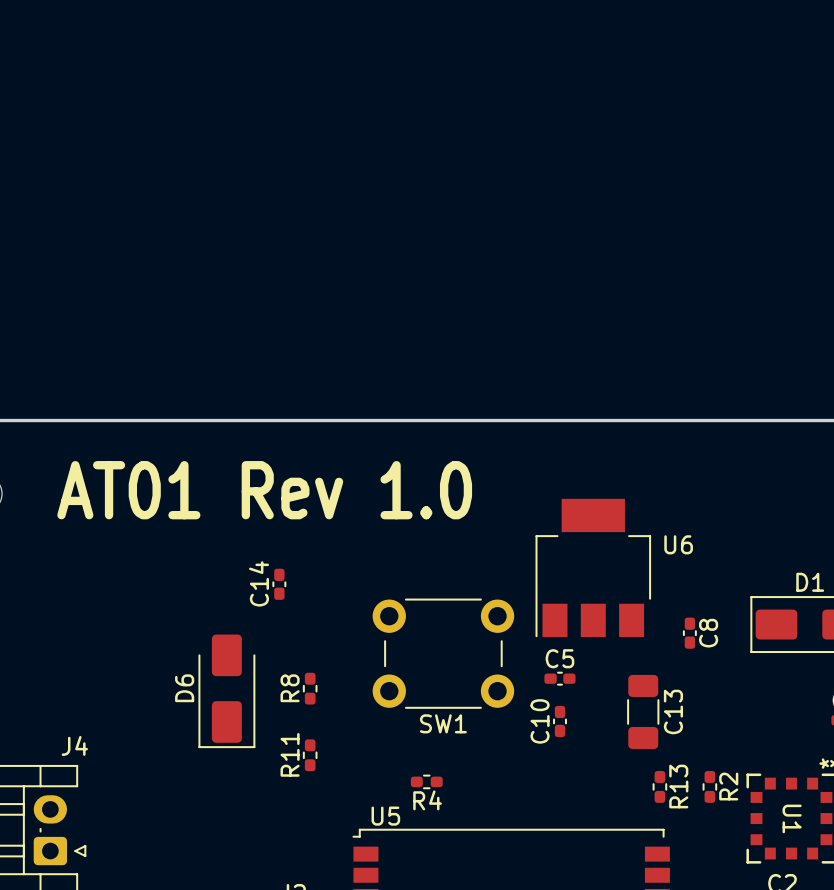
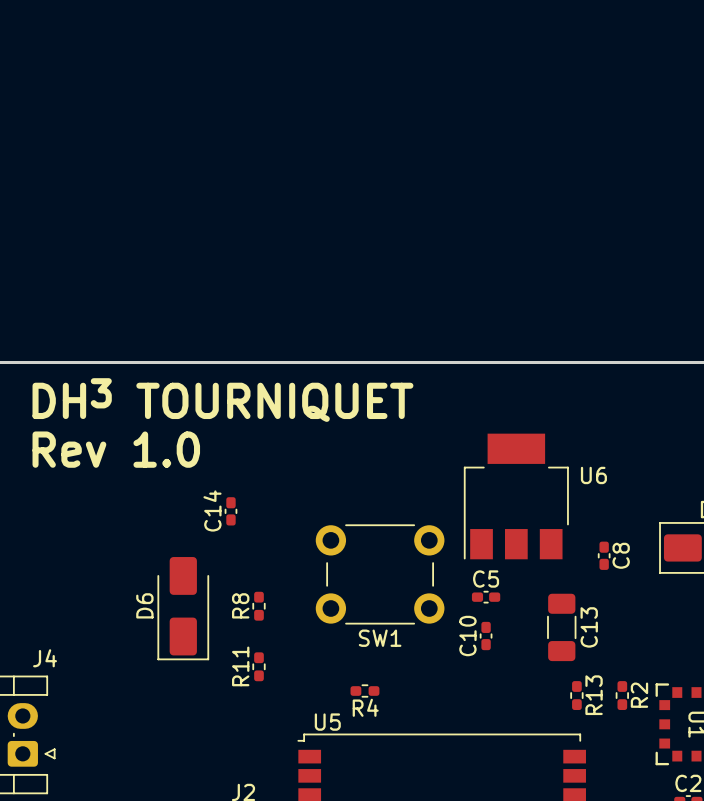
text: none -> DH3 TOURNIQUET (222, 400)
text: AT01 Rev 1.0 (264, 490) -> Rev 1.0 (116, 449)

